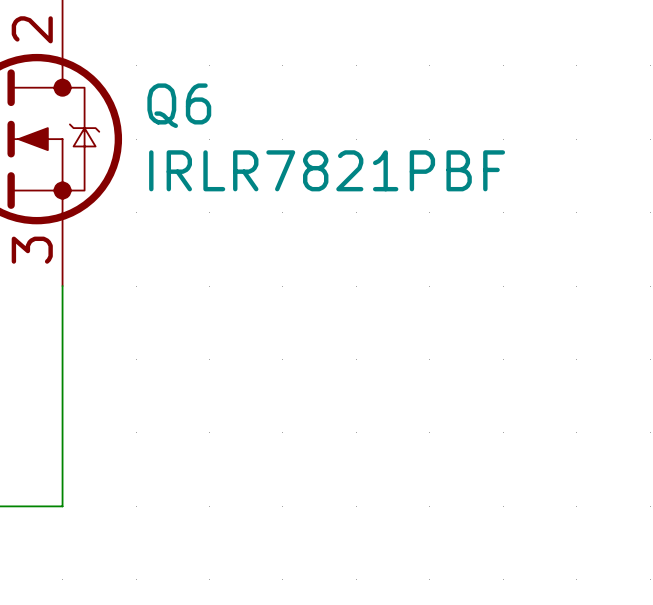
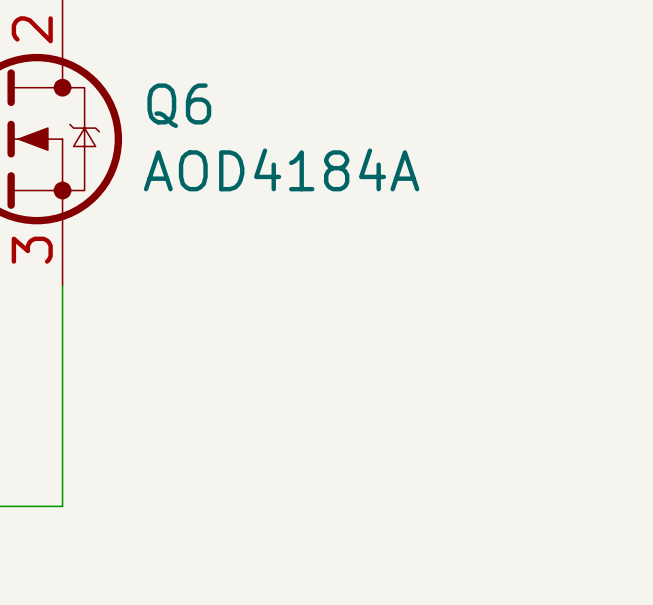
Q6 value: IRLR7821PBF (327, 170) -> AOD4184A (281, 169)

